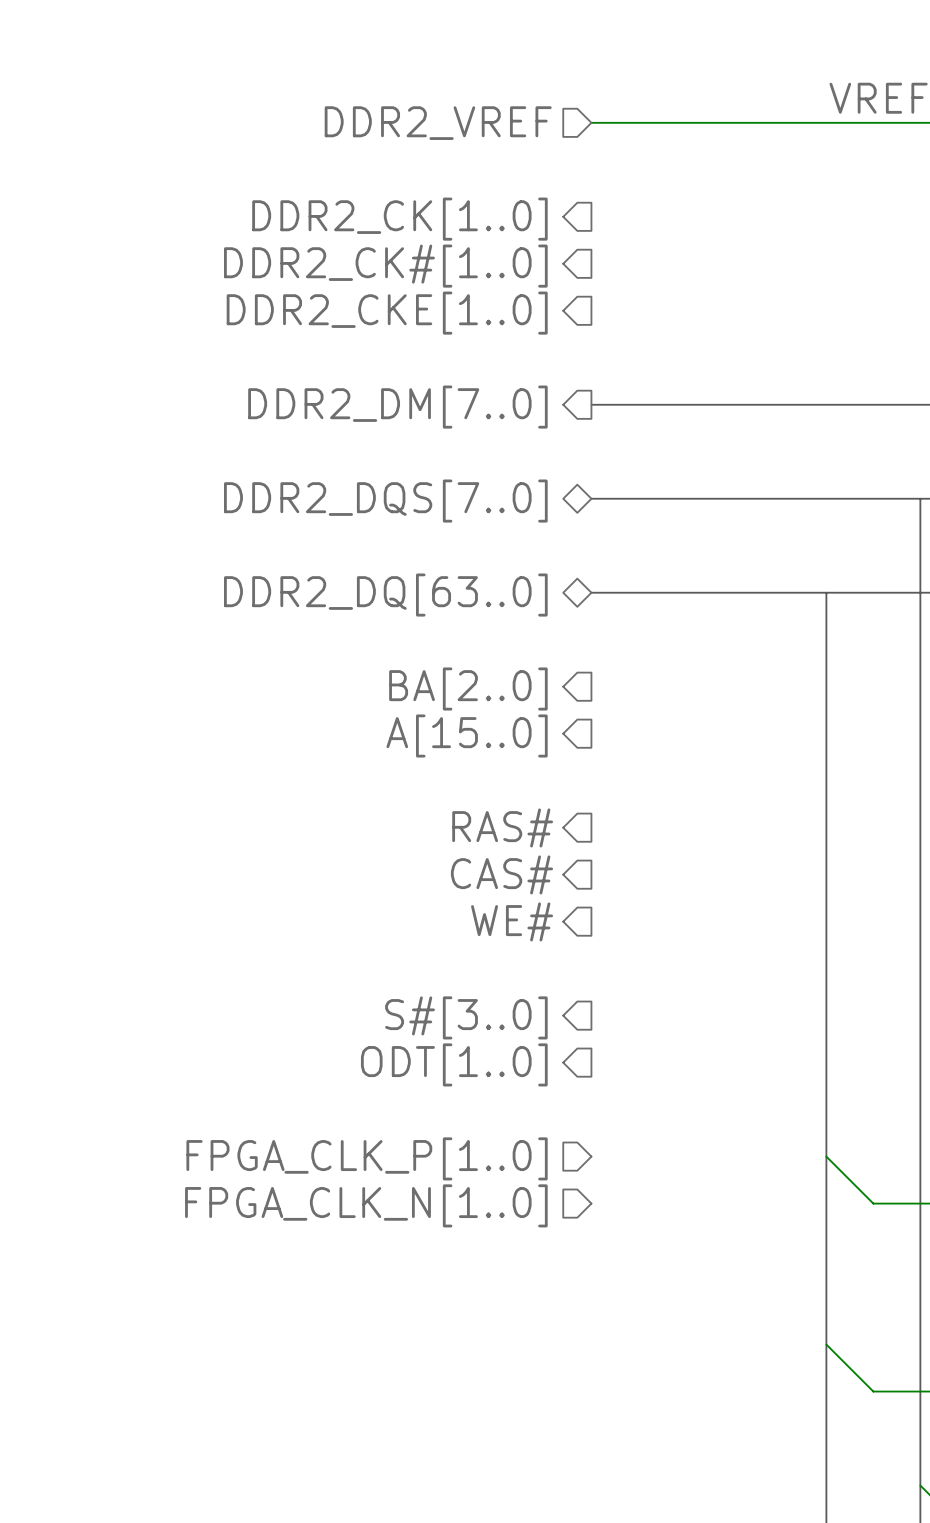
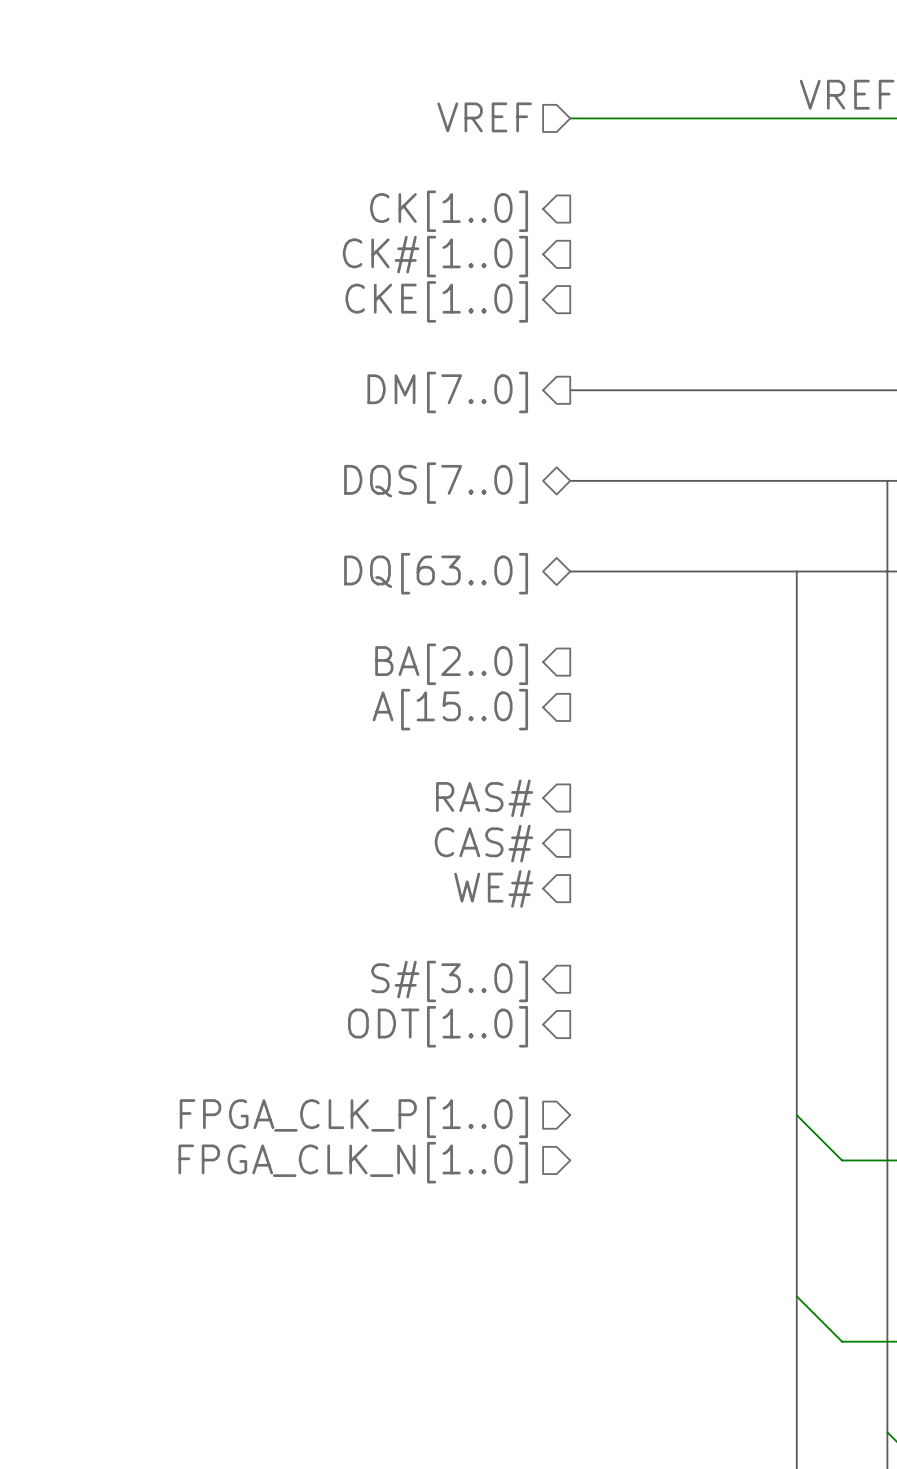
hierarchical label: DDR2_VREF (438, 123) -> VREF (484, 117)
hierarchical label: DDR2_CK[1..0] (399, 219) -> CK[1..0] (449, 211)
hierarchical label: DDR2_CK#[1..0] (385, 266) -> CK#[1..0] (435, 256)
hierarchical label: DDR2_CKE[1..0] (387, 313) -> CKE[1..0] (436, 301)
hierarchical label: DDR2_DM[7..0] (397, 407) -> DM[7..0] (447, 392)
hierarchical label: DDR2_DQS[7..0] (385, 501) -> DQS[7..0] (436, 483)
hierarchical label: DDR2_DQ[63..0] (385, 595) -> DQ[63..0] (436, 573)

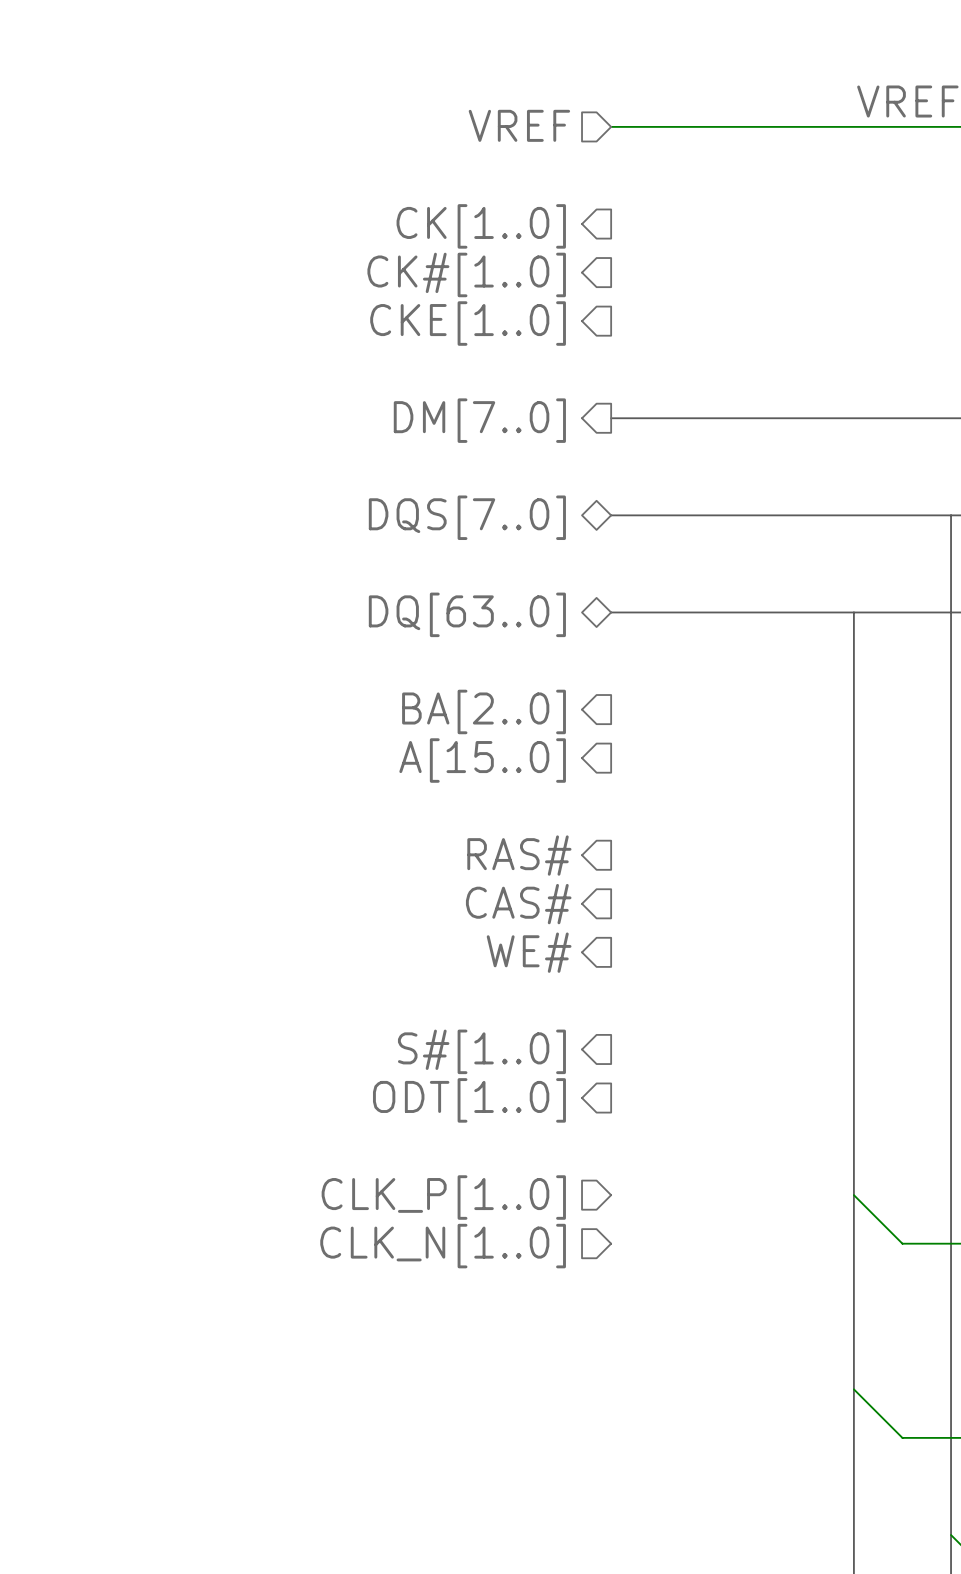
hierarchical label: S#[3..0] (449, 981) -> S#[1..0] (481, 1051)
hierarchical label: FPGA_CLK_P[1..0] (353, 1117) -> CLK_P[1..0] (443, 1197)
hierarchical label: FPGA_CLK_N[1..0] (353, 1162) -> CLK_N[1..0] (443, 1246)

